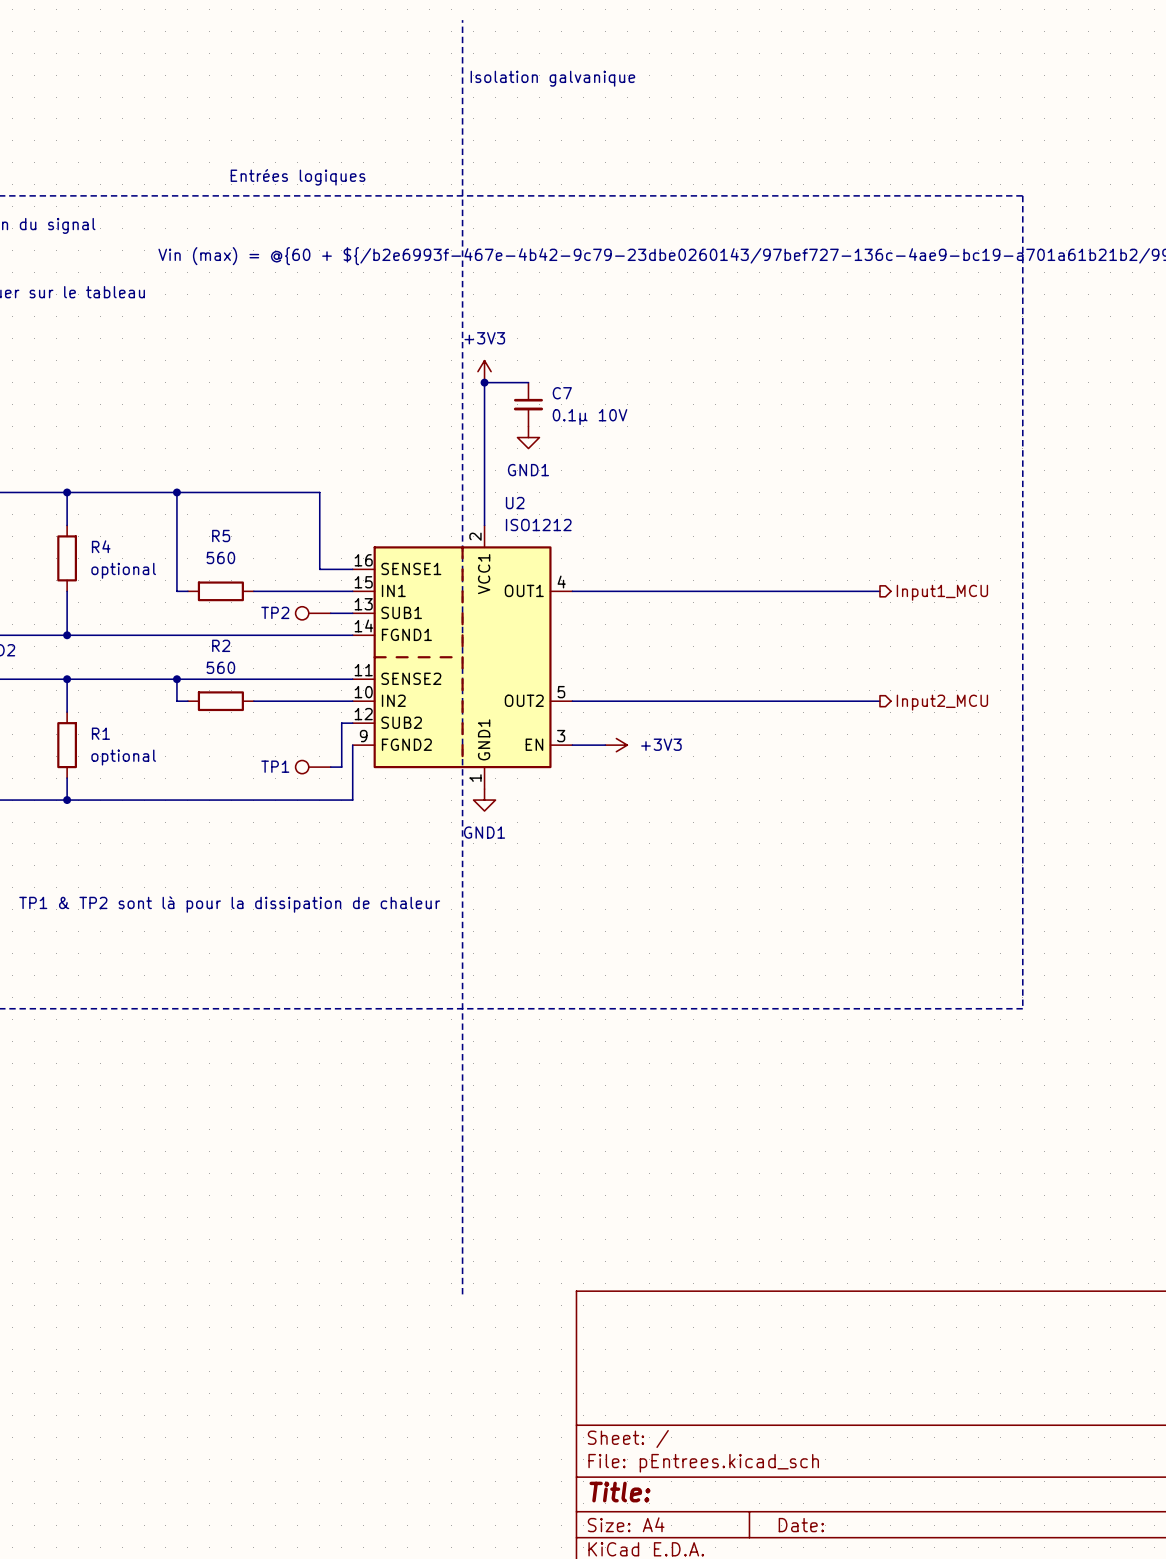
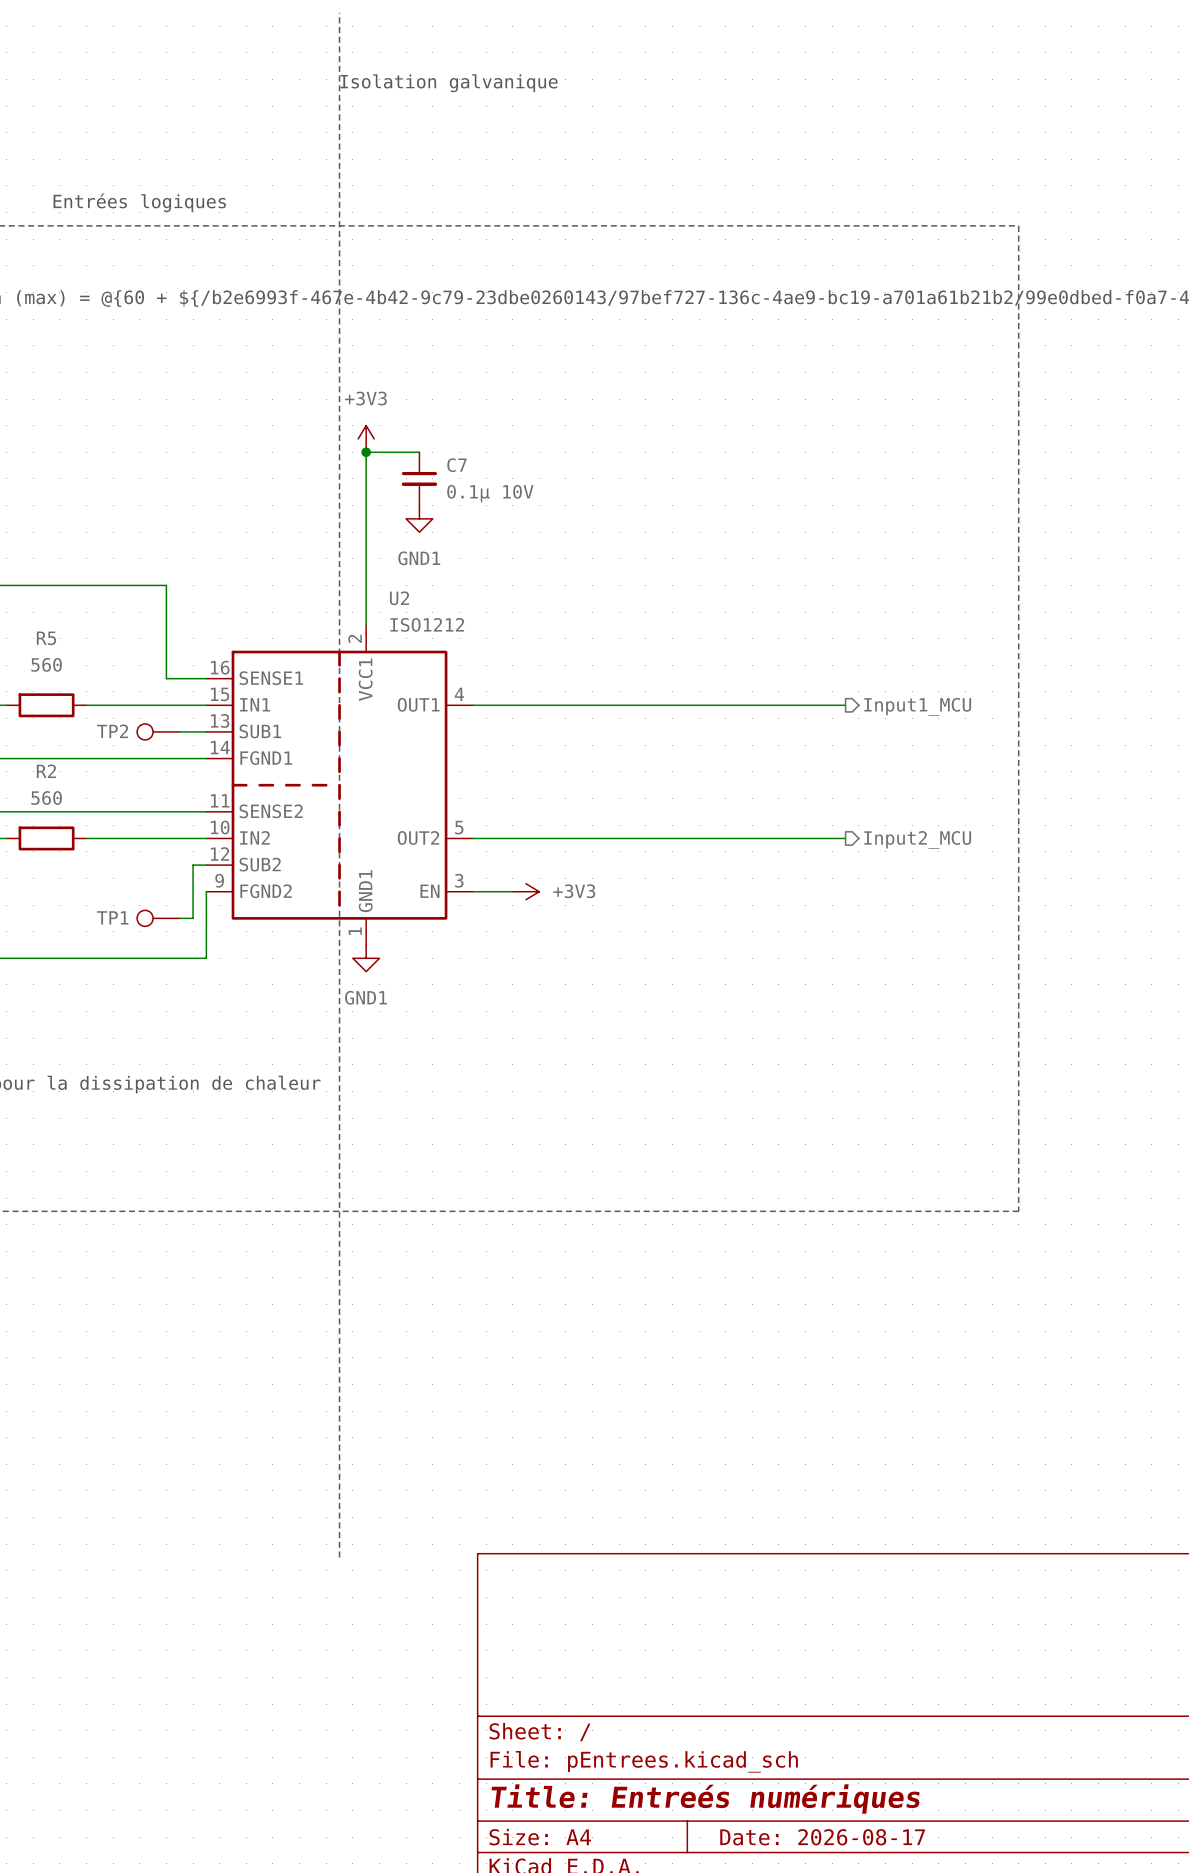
title block: Title: (619, 1492) -> Title: Entreés numériques (705, 1799)
title block: Date: (801, 1525) -> Date: 2026-08-17 (822, 1837)

